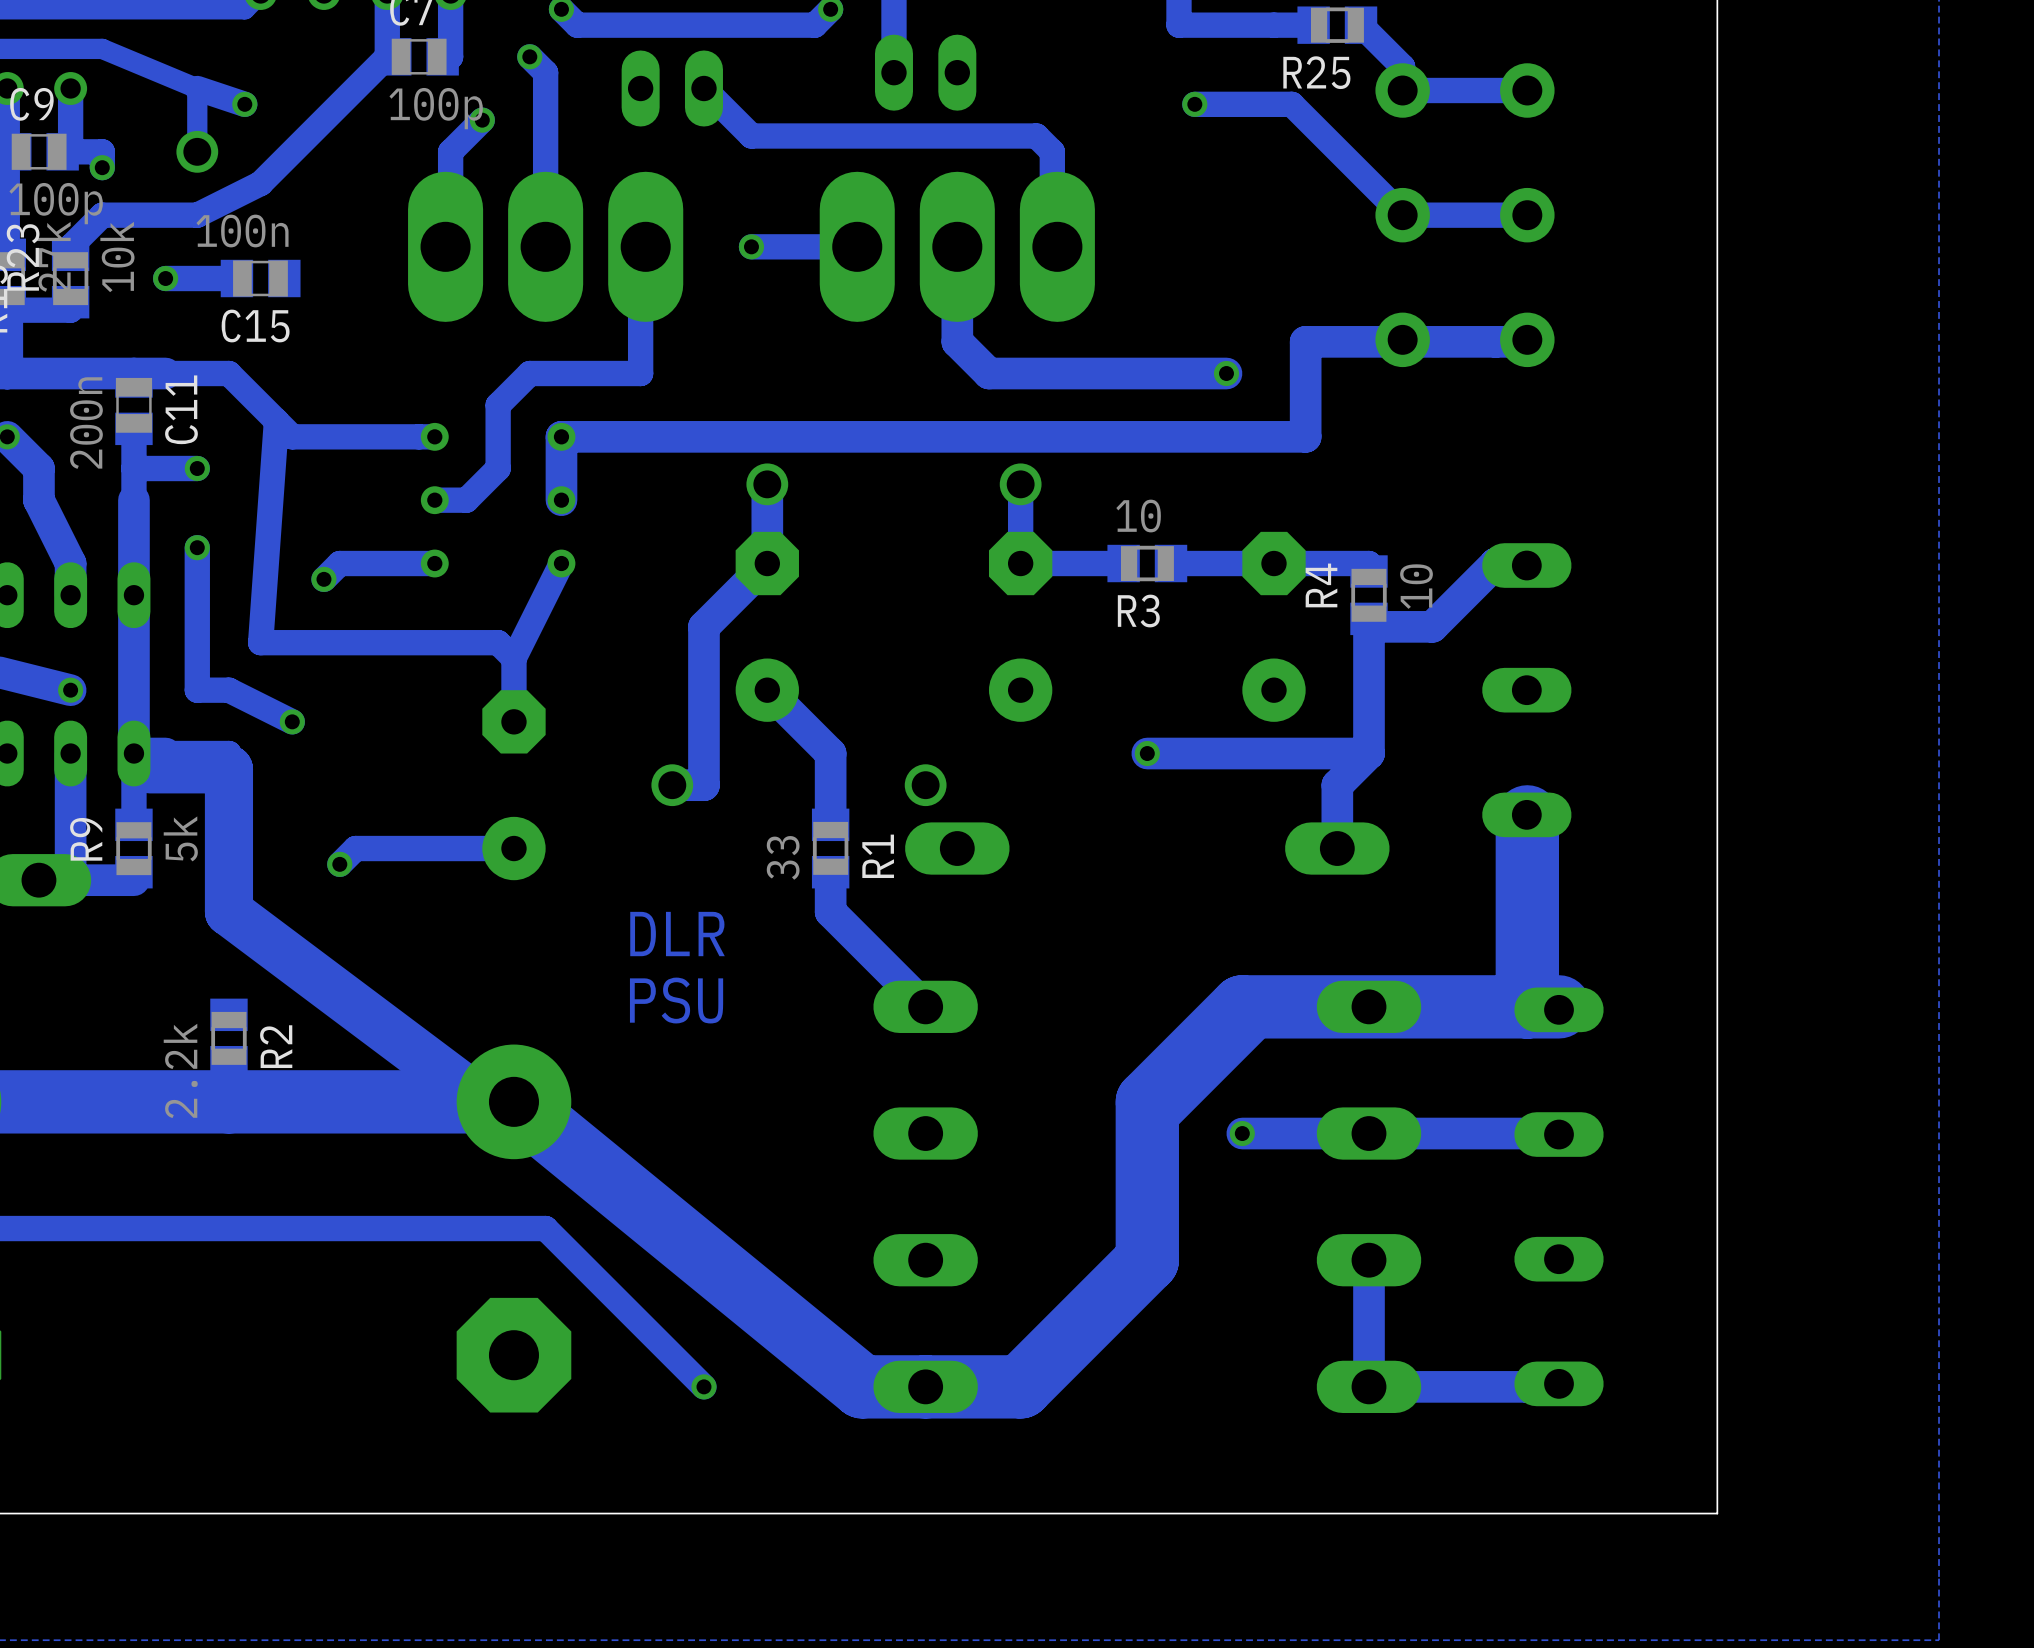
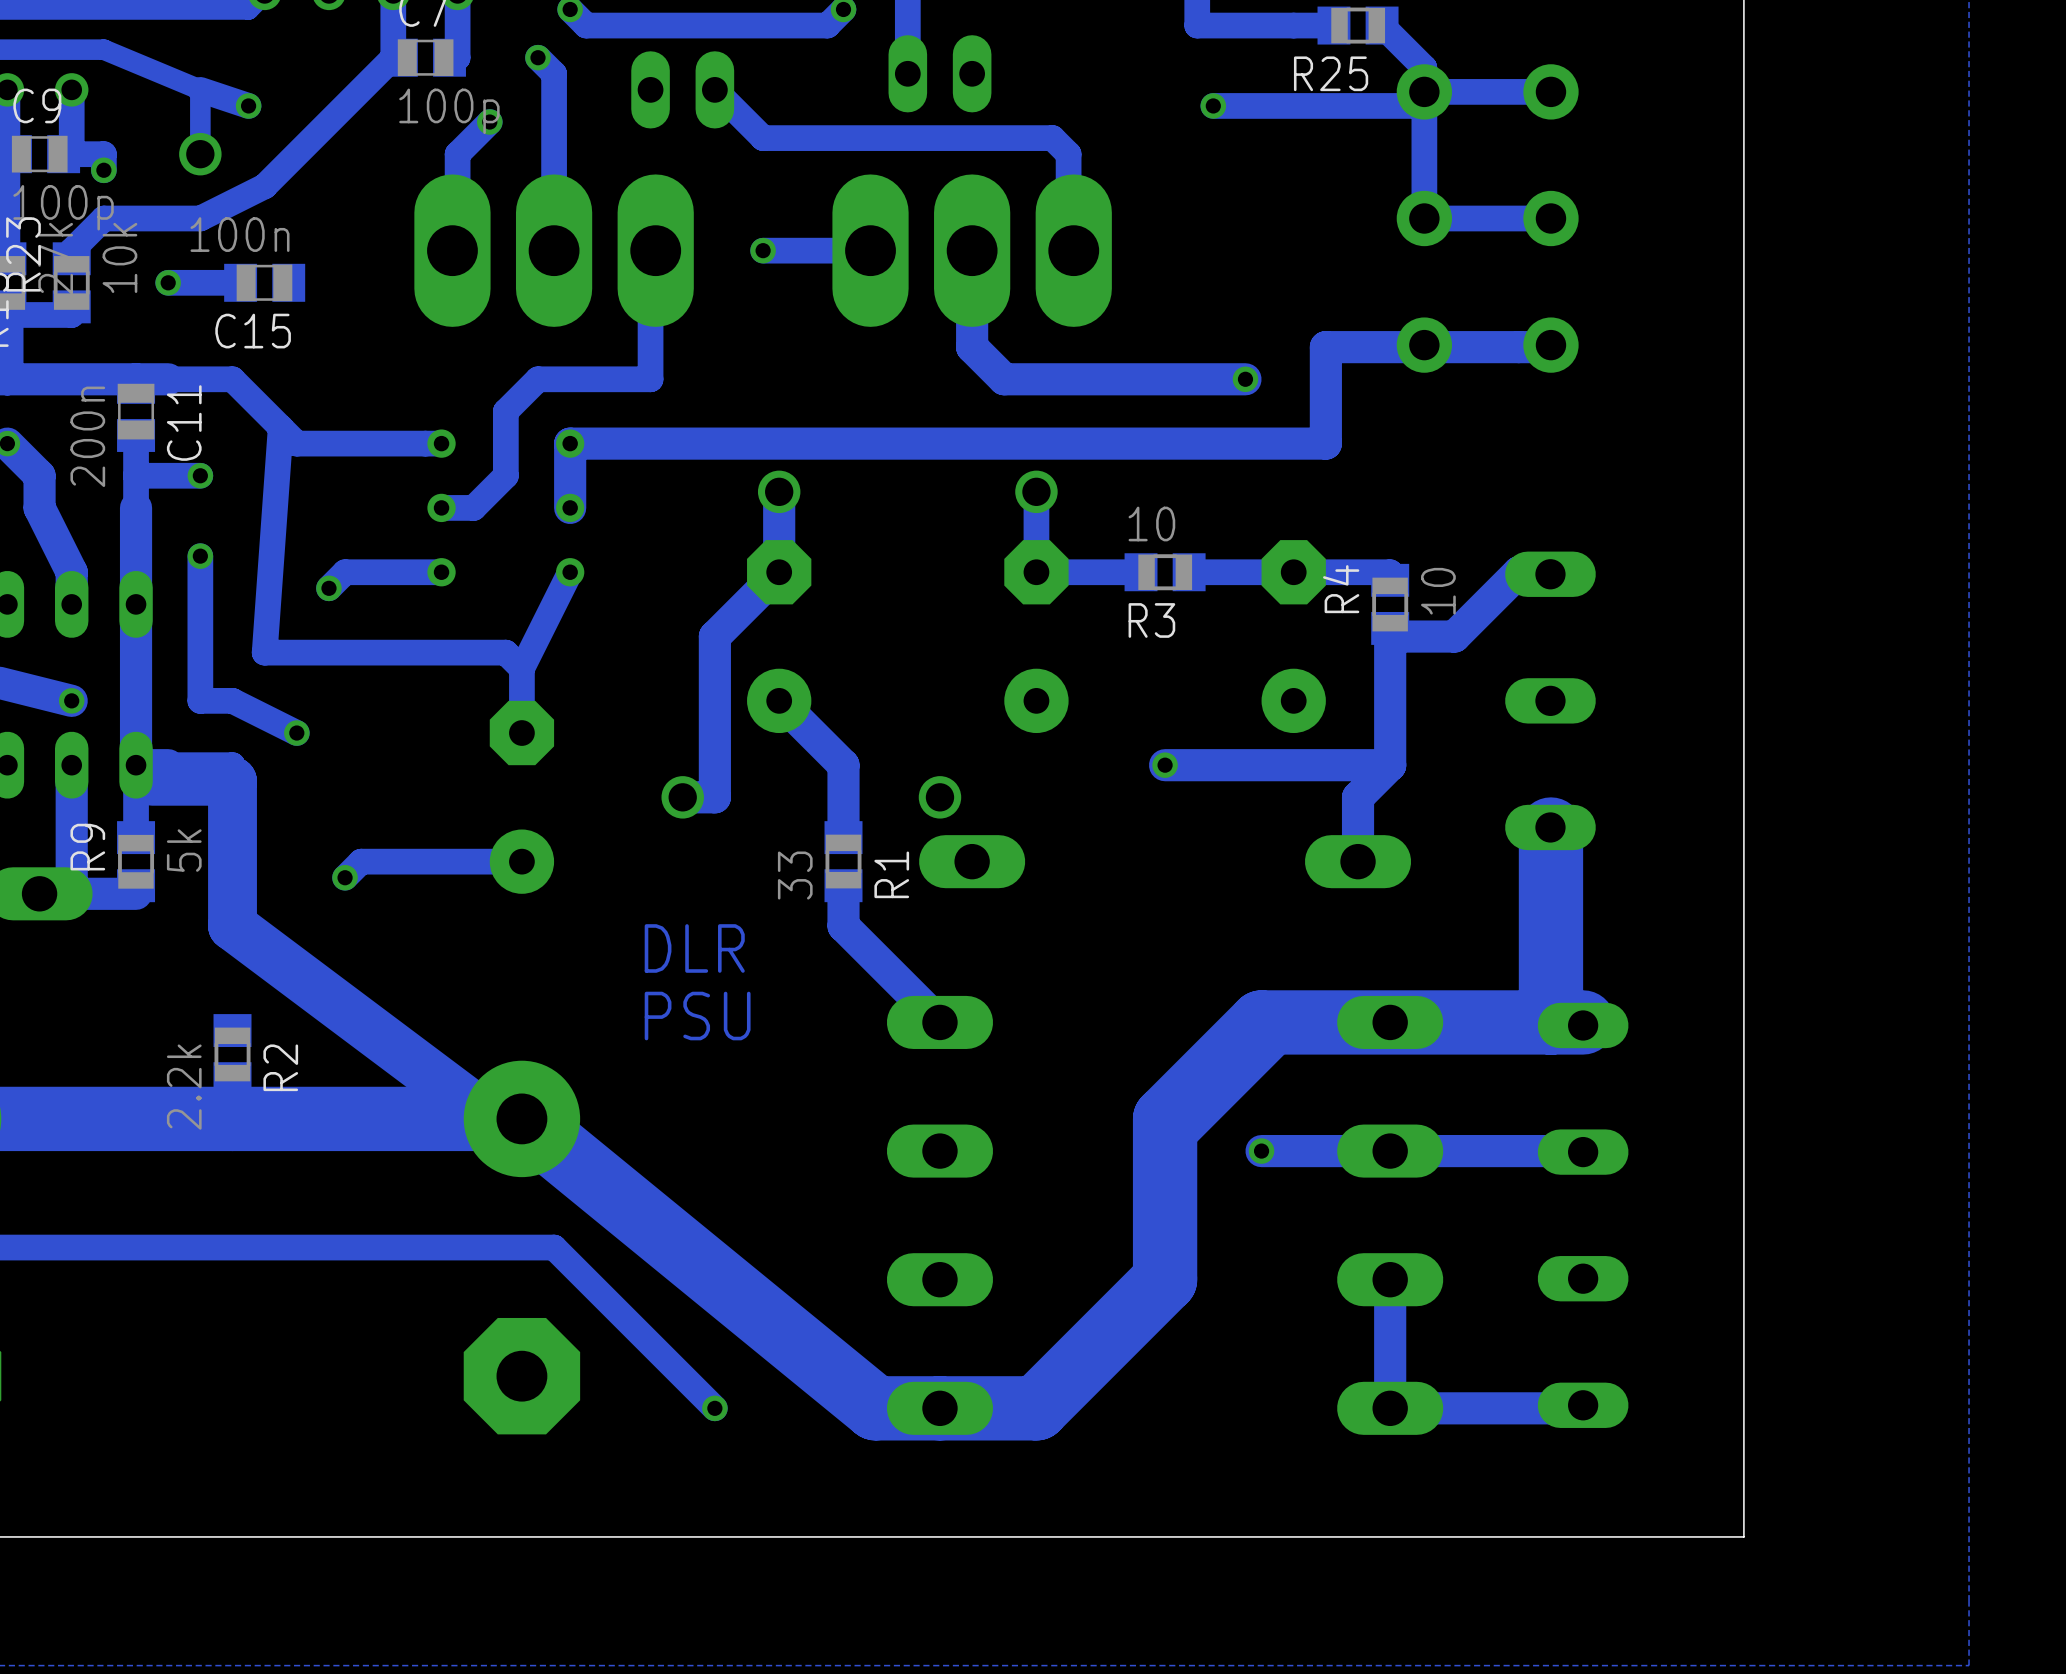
track: (1291, 104) (1402, 215) -> (1422, 105) (1424, 107) (1424, 218)
track: none -> (1422, 105) (1311, 105)

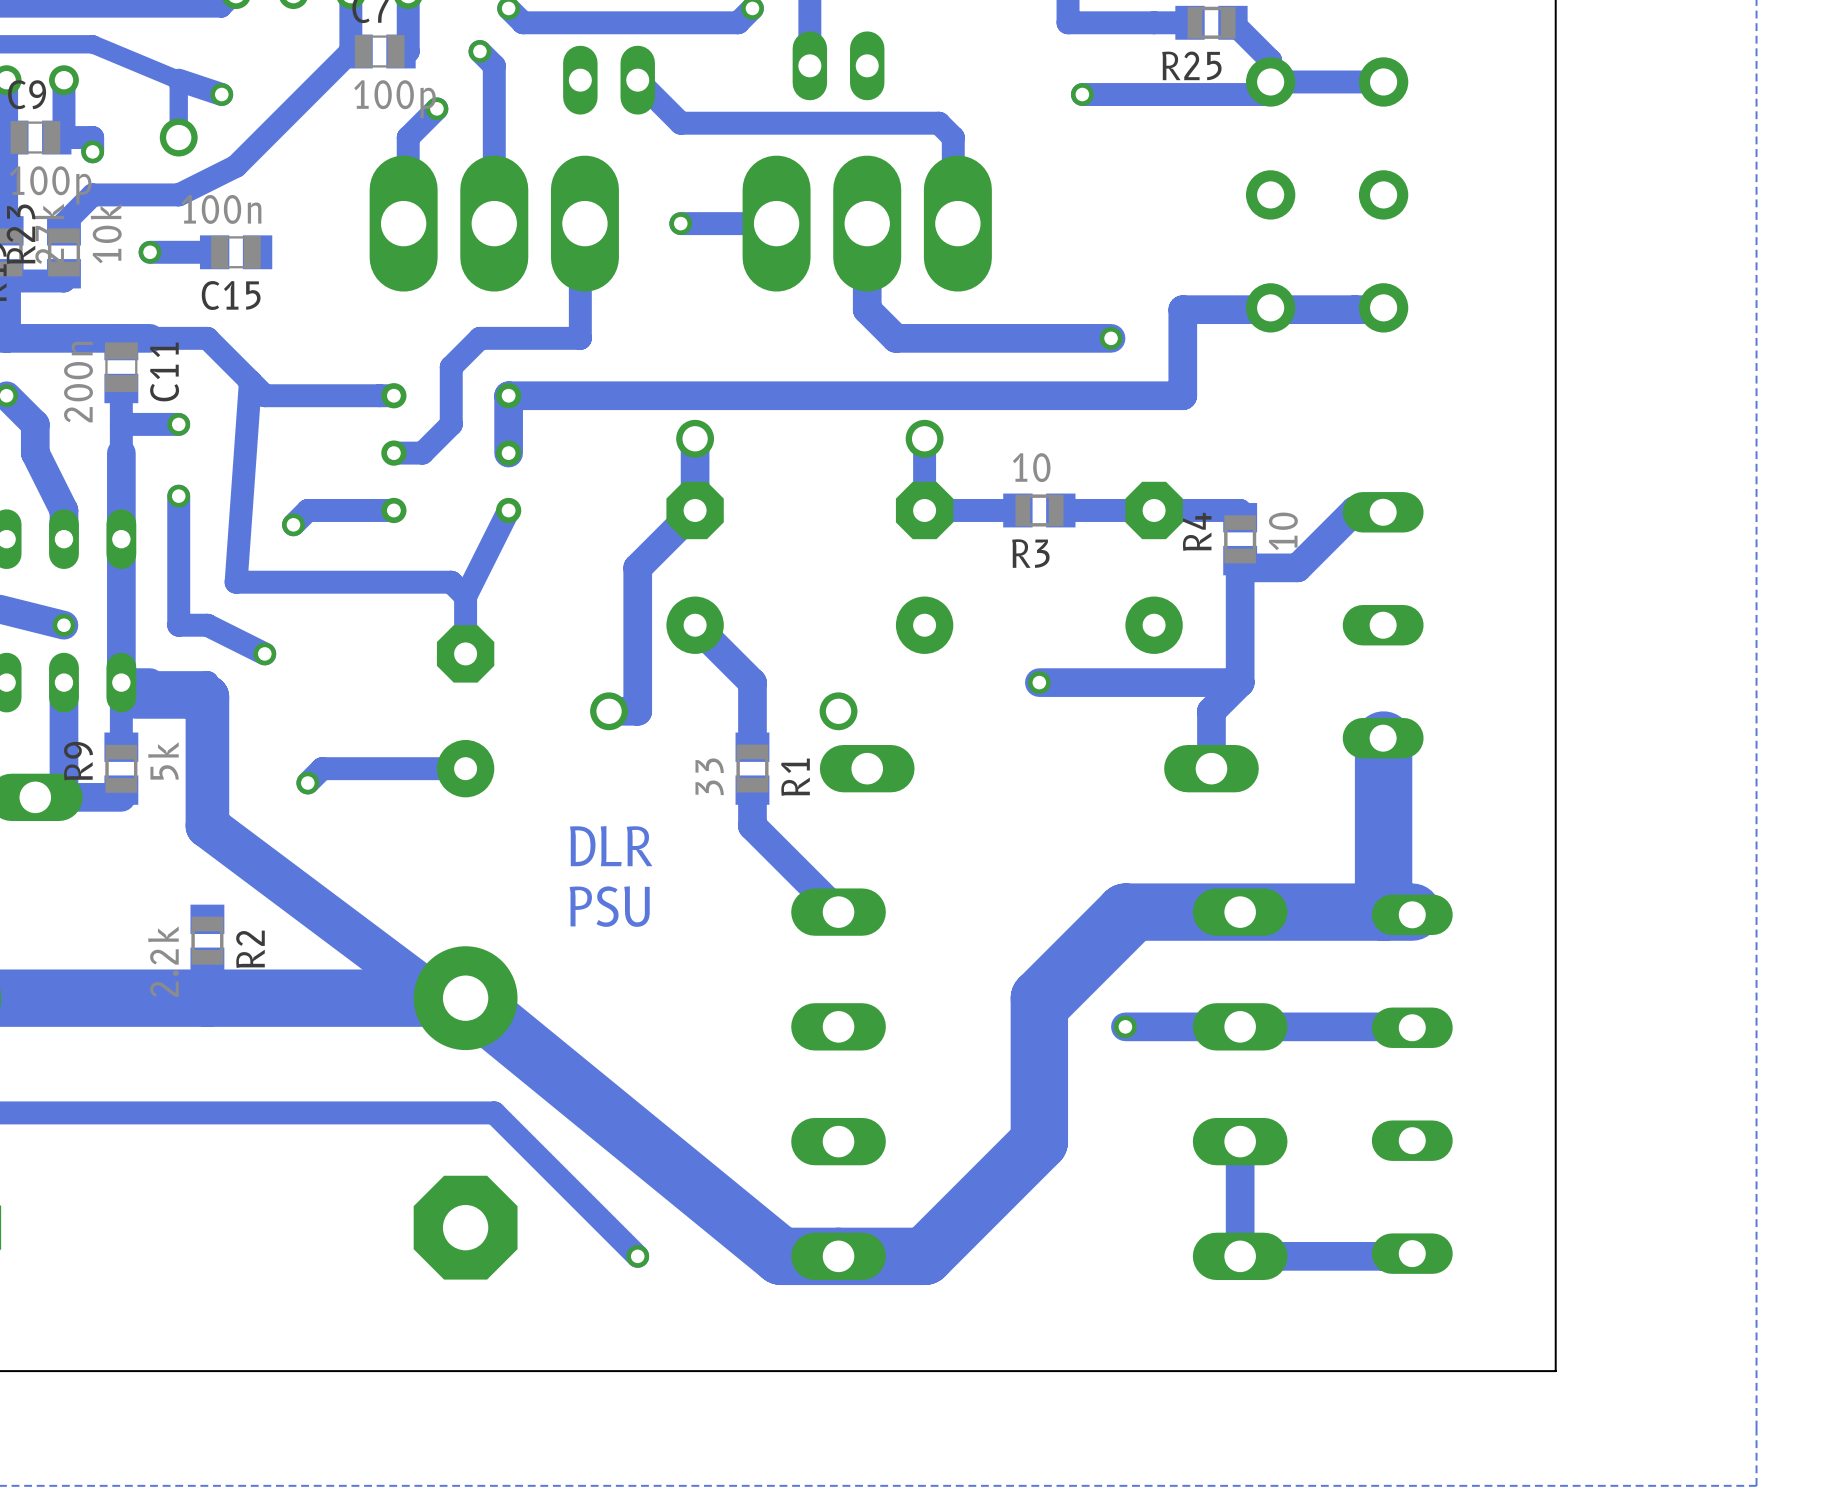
track: (1422, 105) (1424, 107) (1424, 218) (1550, 218) -> none

